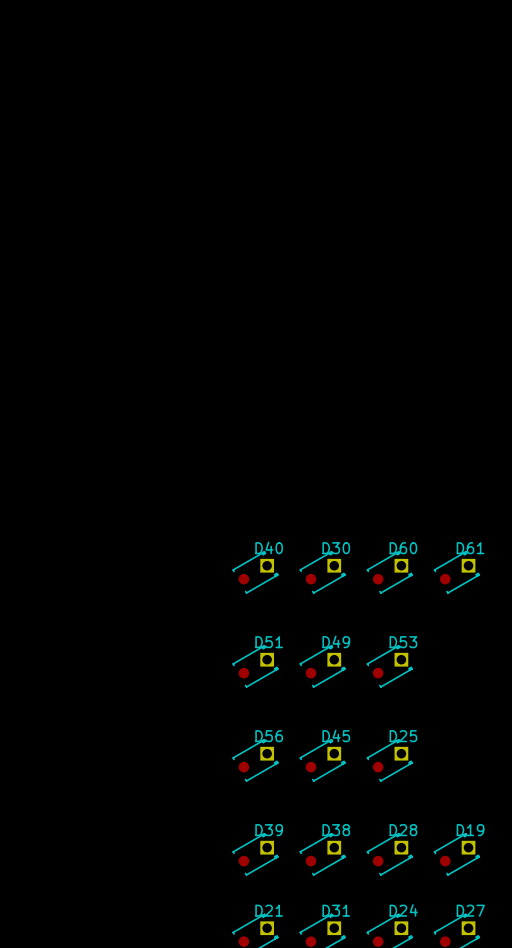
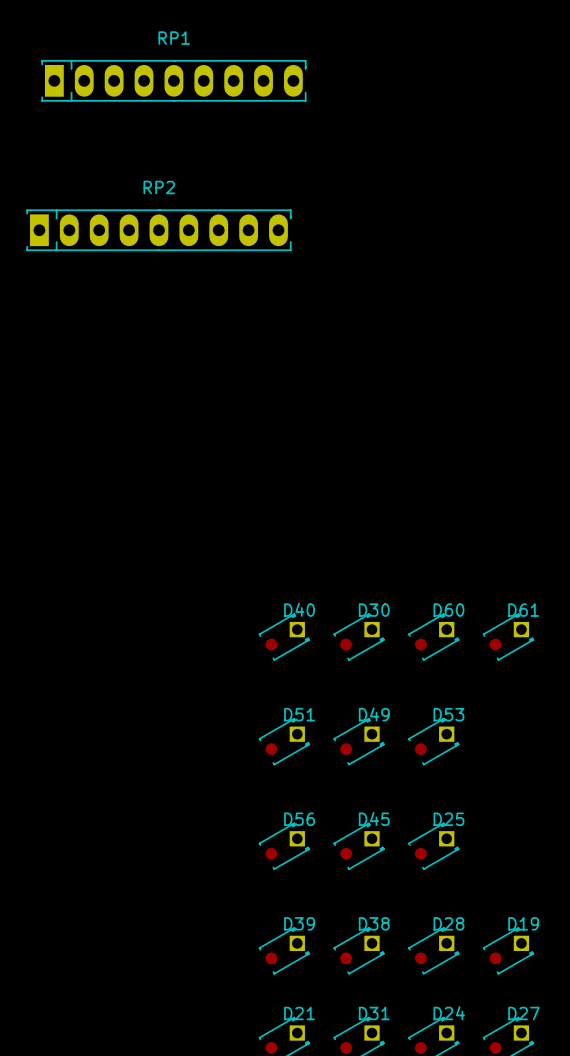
RP1: none -> (173, 80)
RP2: none -> (158, 230)

